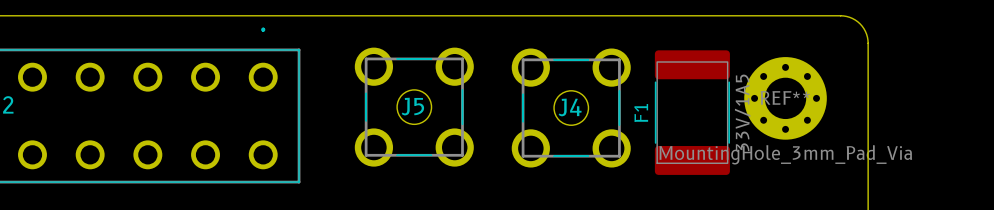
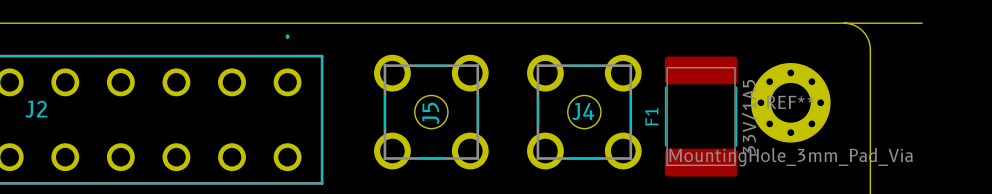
board edge: none -> (843, 23) (922, 23)
J5 rotation: 0° (414, 107) -> 90° counterclockwise (431, 112)

